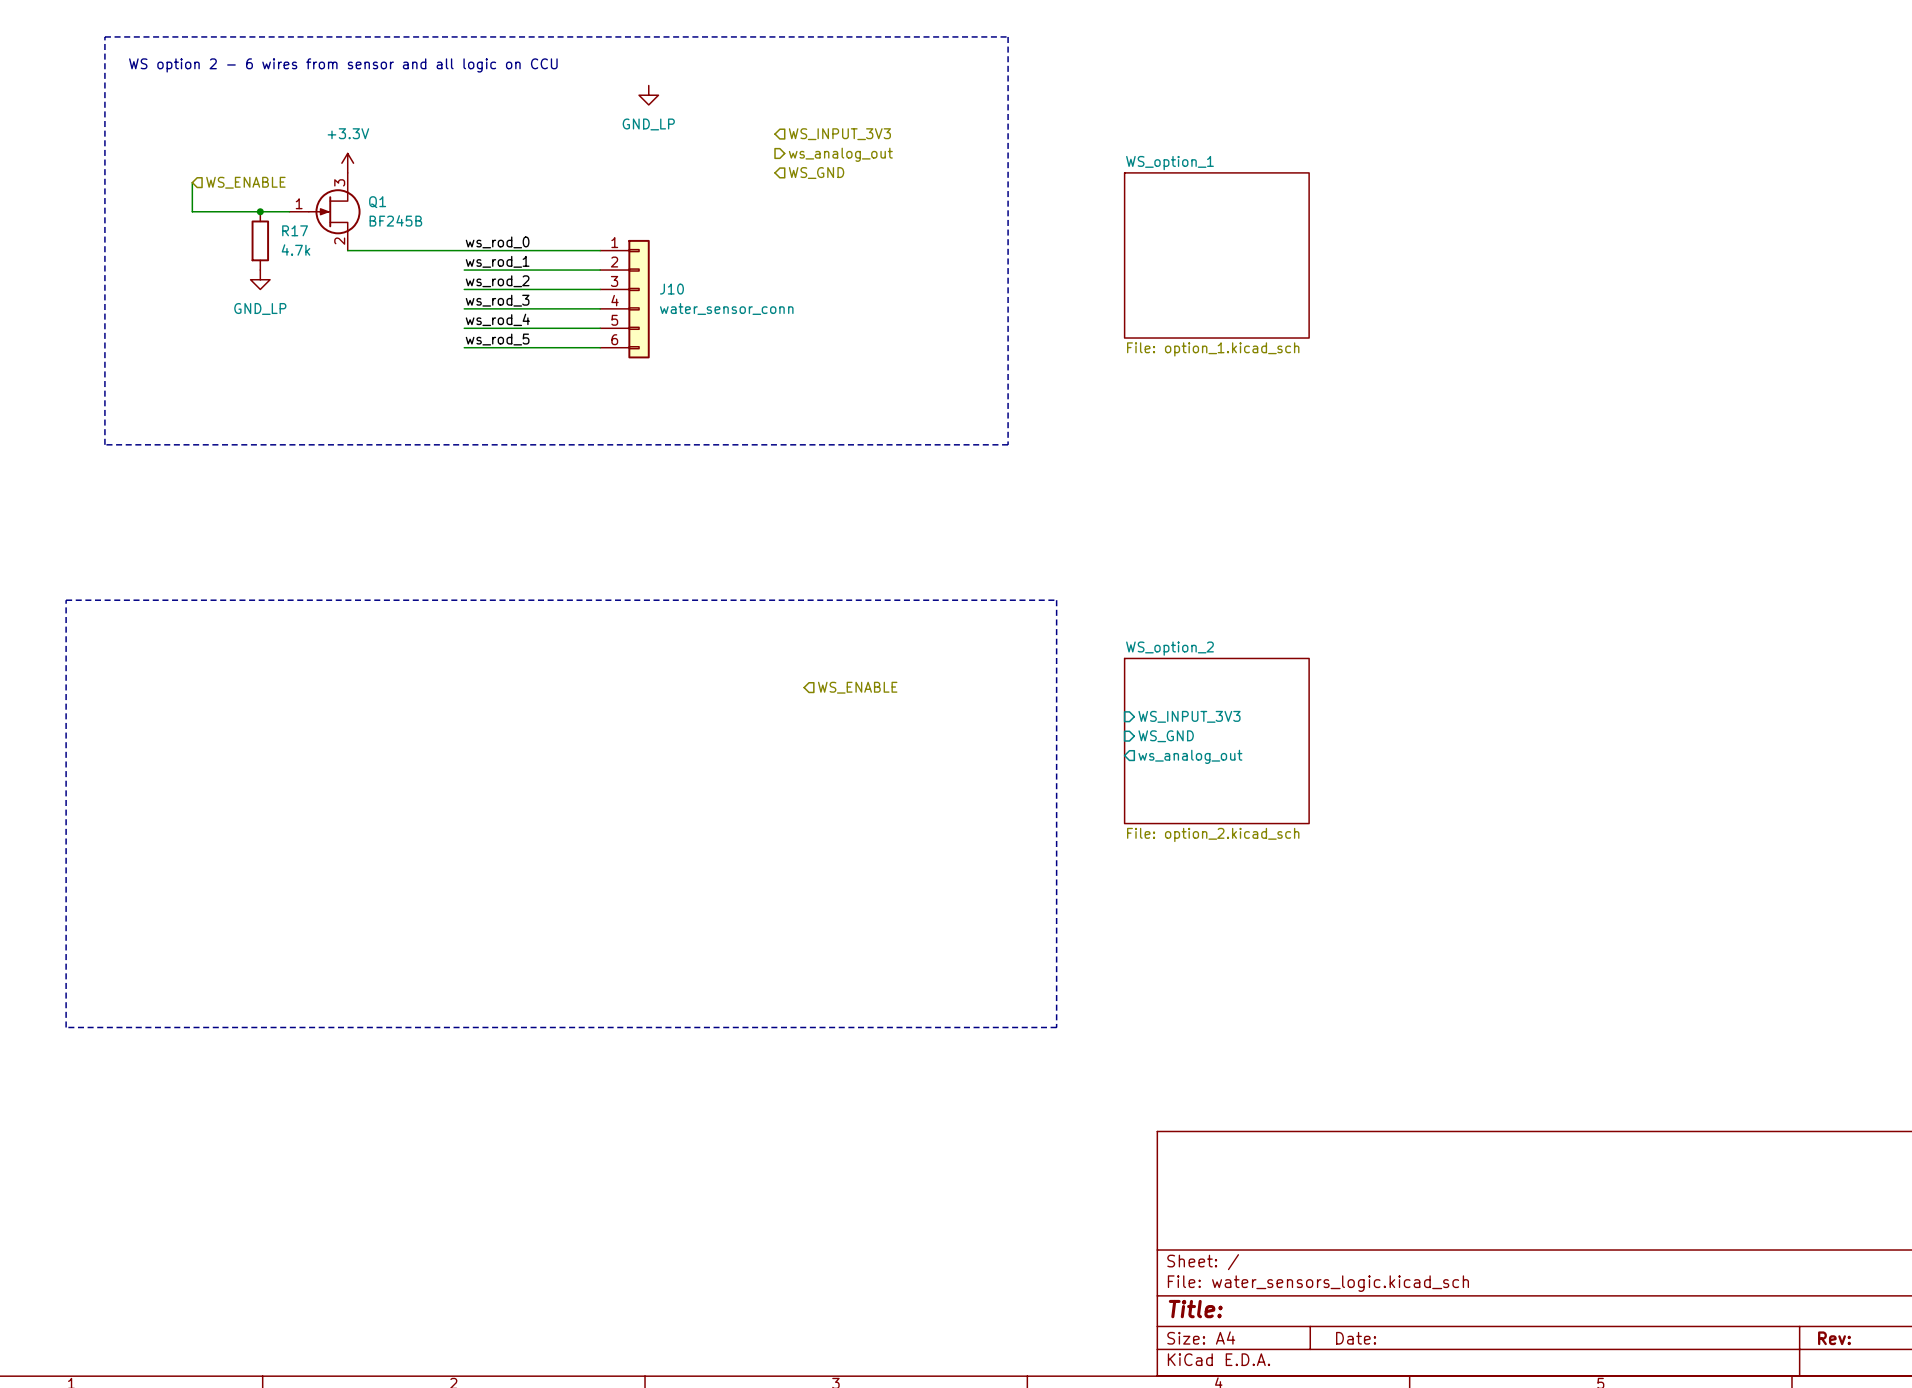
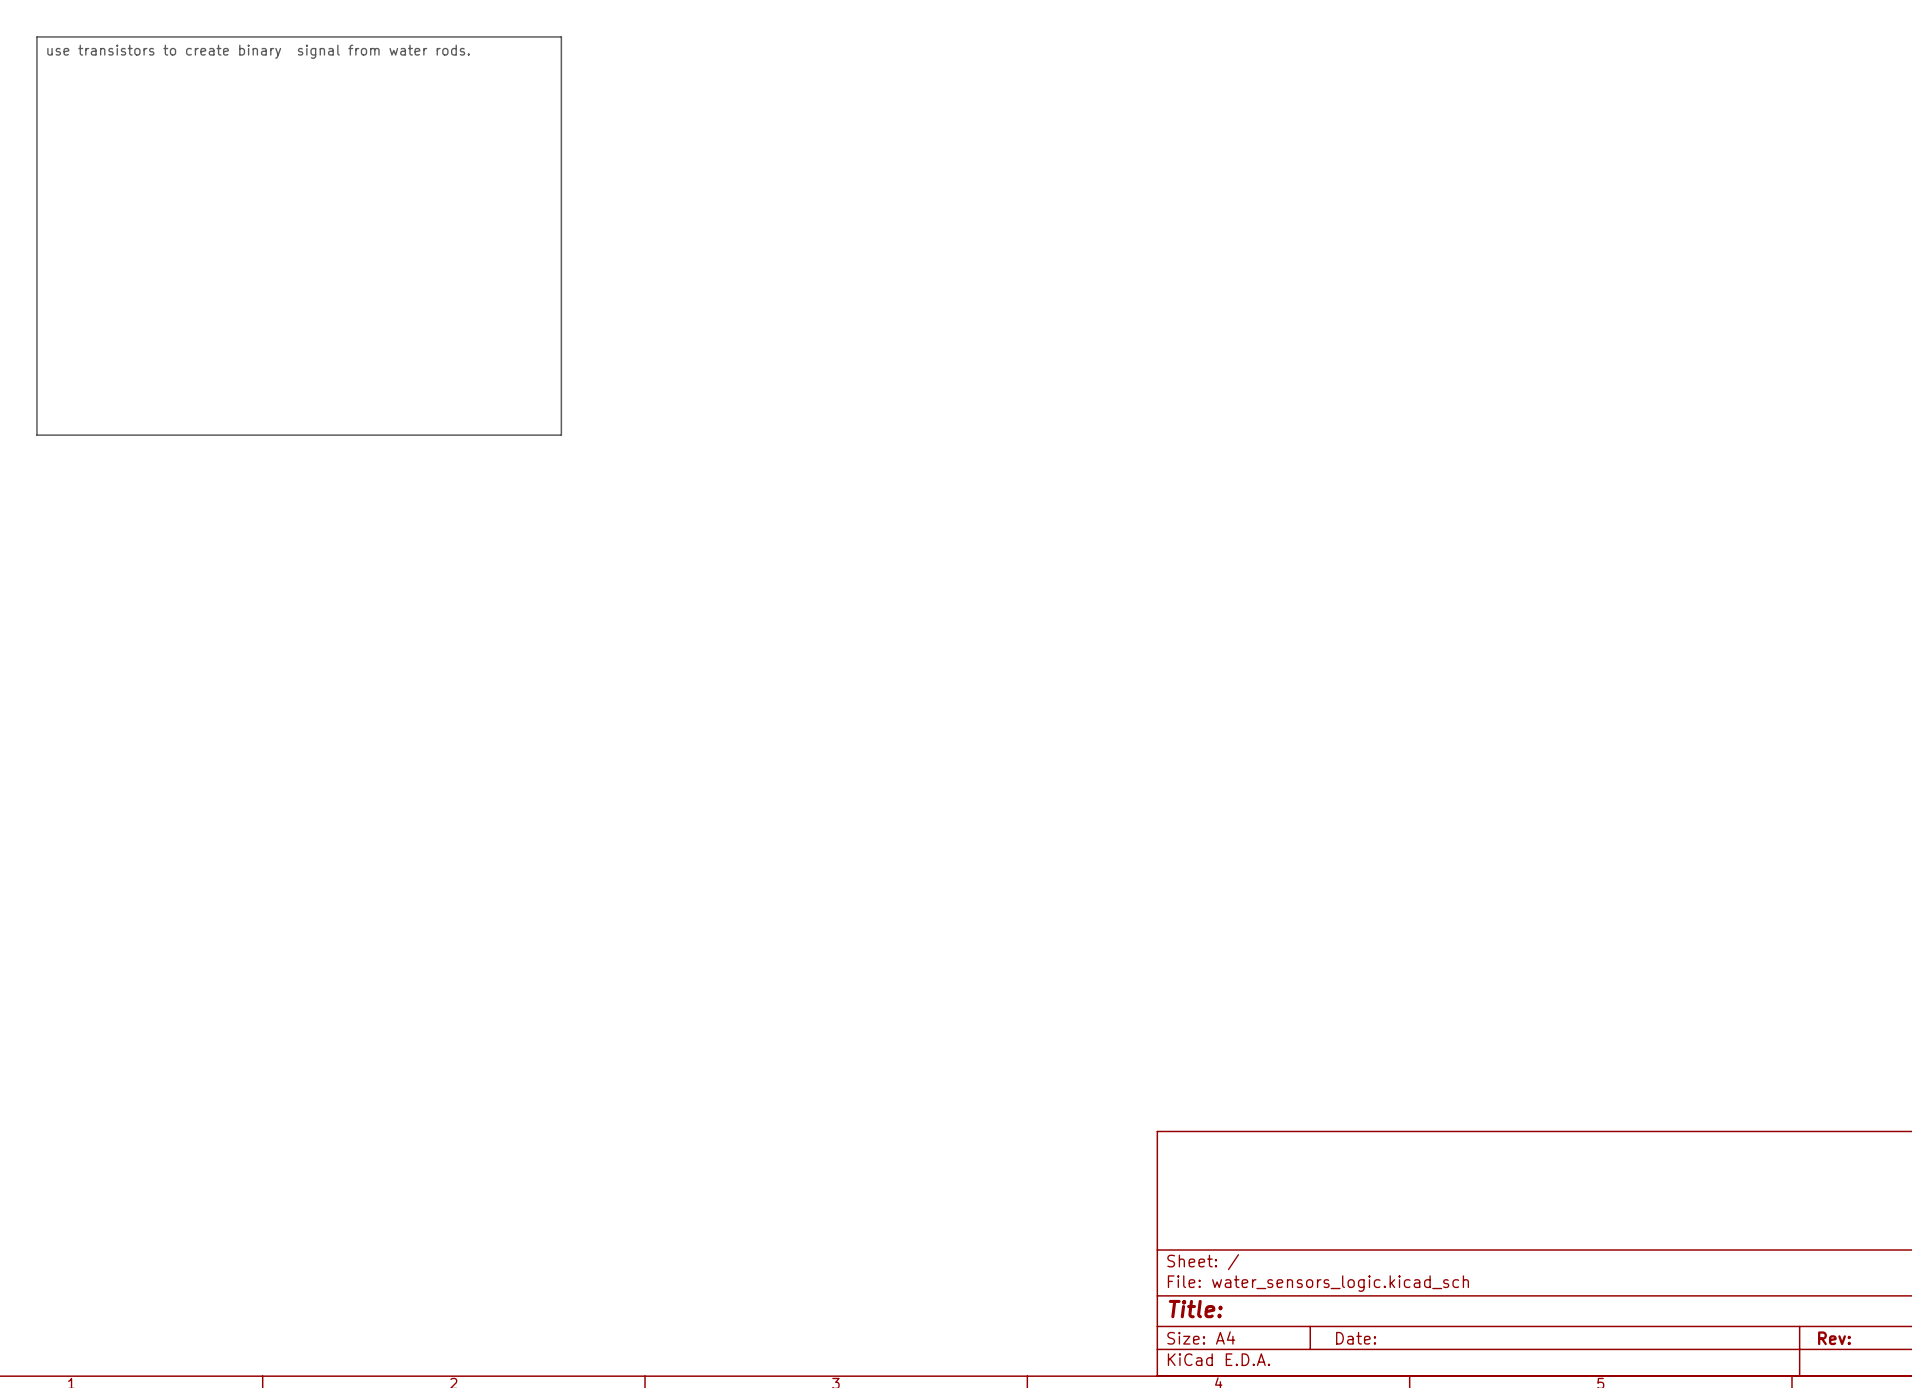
line: none -> (36, 36) (561, 36) (561, 435) (36, 435) (36, 36)
line: (104, 36) (1008, 36) (1008, 444) (104, 444) (104, 36) -> none
text: none -> use transistors to create binary signal from water rods. (258, 51)
text: WS option 2 - 6 wires from sensor and all logic on CCU (343, 65) -> none
power symbol: GND_LP (648, 95) -> none
hierarchical label: WS_INPUT_3V3 (839, 134) -> none
hierarchical label: ws_analog_out (840, 154) -> none
power symbol: +3.3V (347, 163) -> none
hierarchical label: WS_GND (816, 173) -> none
wire: (192, 182) (192, 211) (289, 211) -> none
hierarchical label: WS_ENABLE (245, 182) -> none
junction: (260, 211) -> none
Q1: BF245B (324, 211) -> none
R17: 4.7k (260, 240) -> none
label: ws_rod_0 (497, 242) -> none
wire: (347, 250) (600, 250) -> none
sheet WS_option_1: File: option_1.kicad_sch (1216, 255) -> none
label: ws_rod_1 (497, 261) -> none
wire: (464, 270) (600, 270) -> none
power symbol: GND_LP (260, 279) -> none
label: ws_rod_2 (497, 281) -> none
wire: (464, 289) (600, 289) -> none
J10: water_sensor_conn (624, 299) -> none
label: ws_rod_3 (497, 300) -> none
wire: (464, 308) (600, 308) -> none
label: ws_rod_4 (497, 319) -> none
wire: (464, 328) (600, 328) -> none
label: ws_rod_5 (497, 339) -> none
wire: (464, 347) (600, 347) -> none
line: (66, 600) (1056, 600) (1056, 1027) (66, 1027) (66, 600) -> none
hierarchical label: WS_ENABLE (857, 687) -> none
sheet pin: WS_INPUT_3V3 (1189, 716) -> none
sheet pin: WS_GND (1166, 736) -> none
sheet WS_option_2: File: option_2.kicad_sch (1216, 741) -> none
sheet pin: ws_analog_out (1190, 756) -> none

